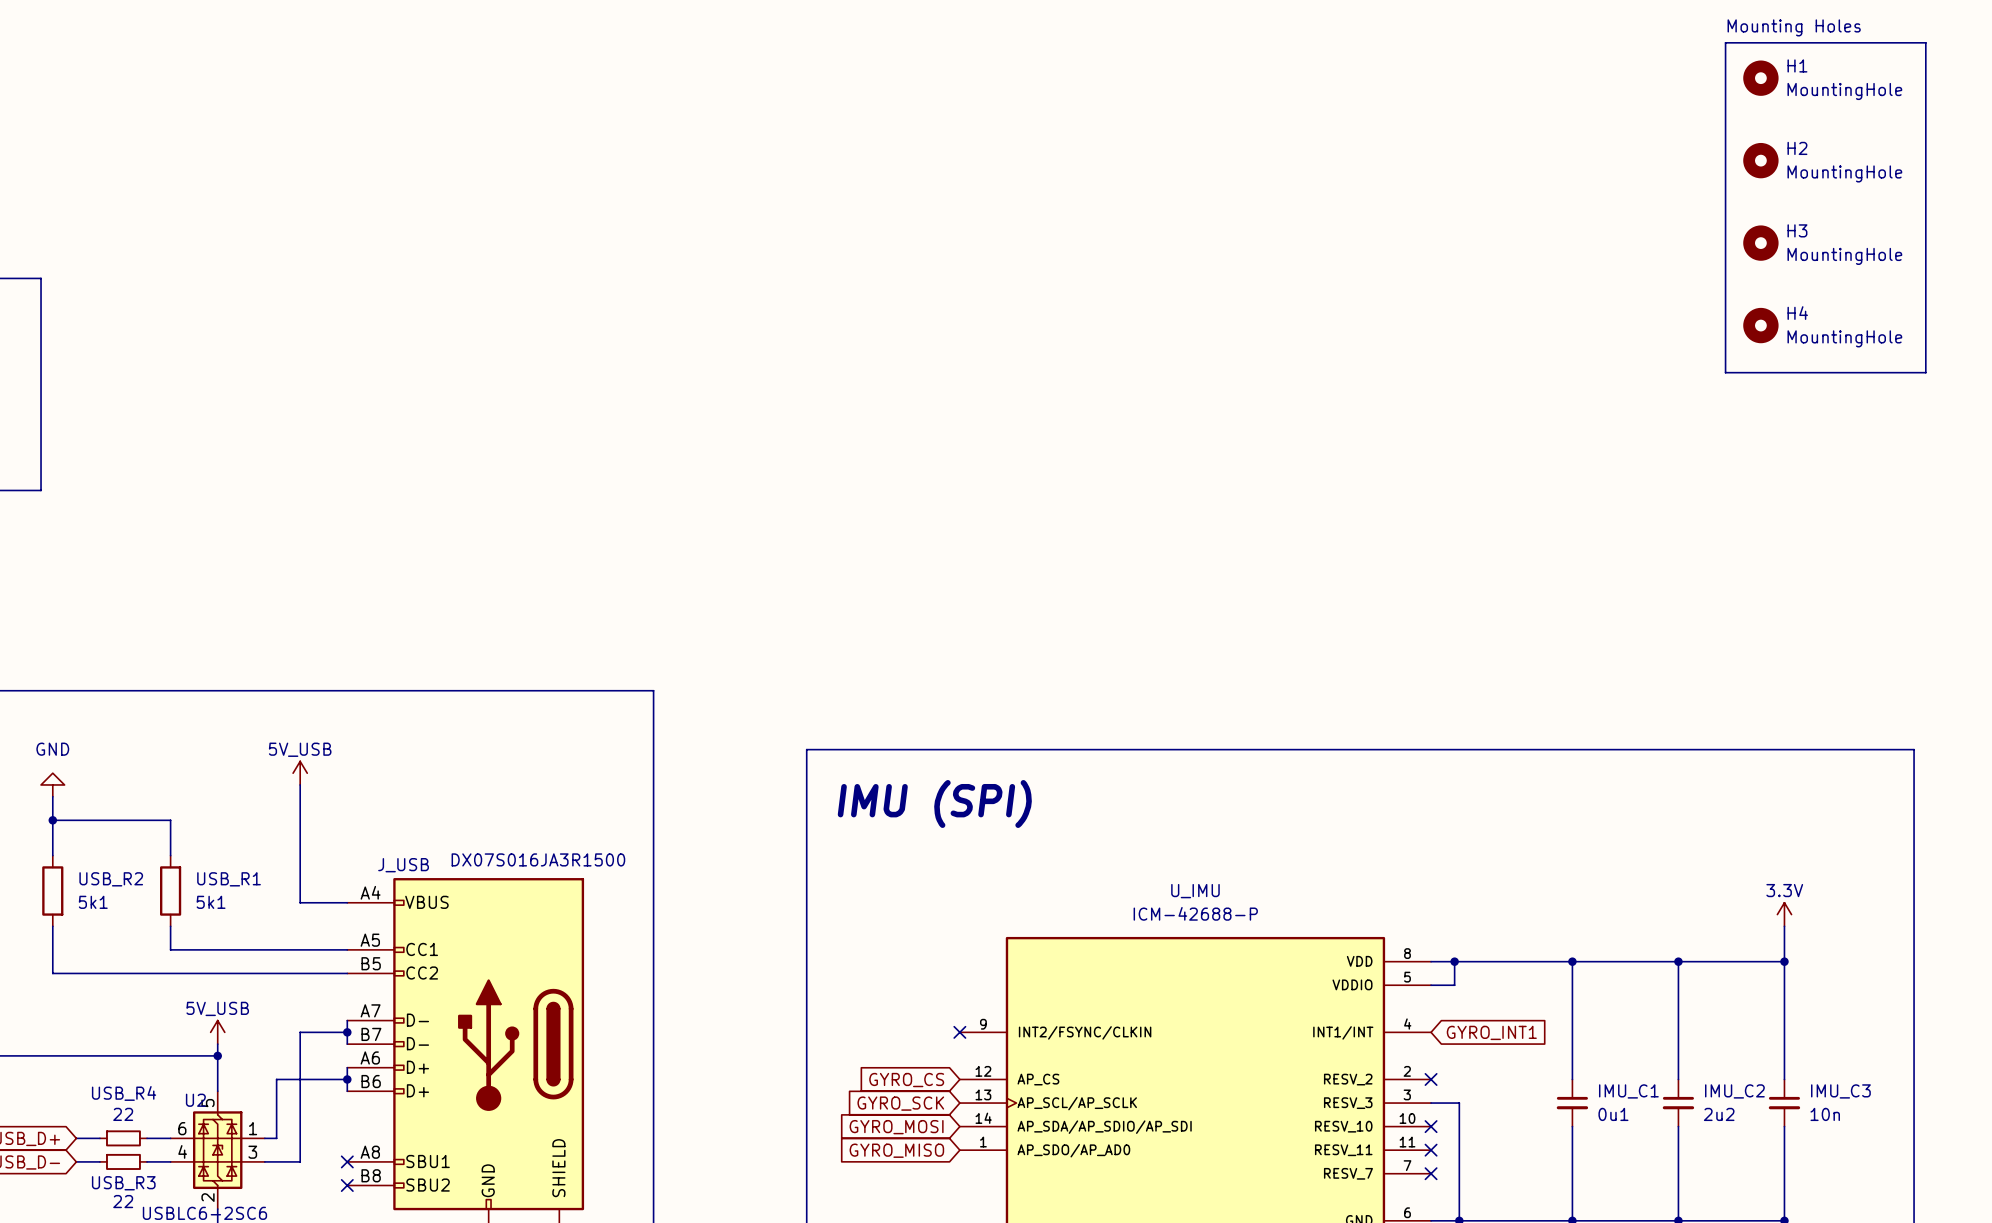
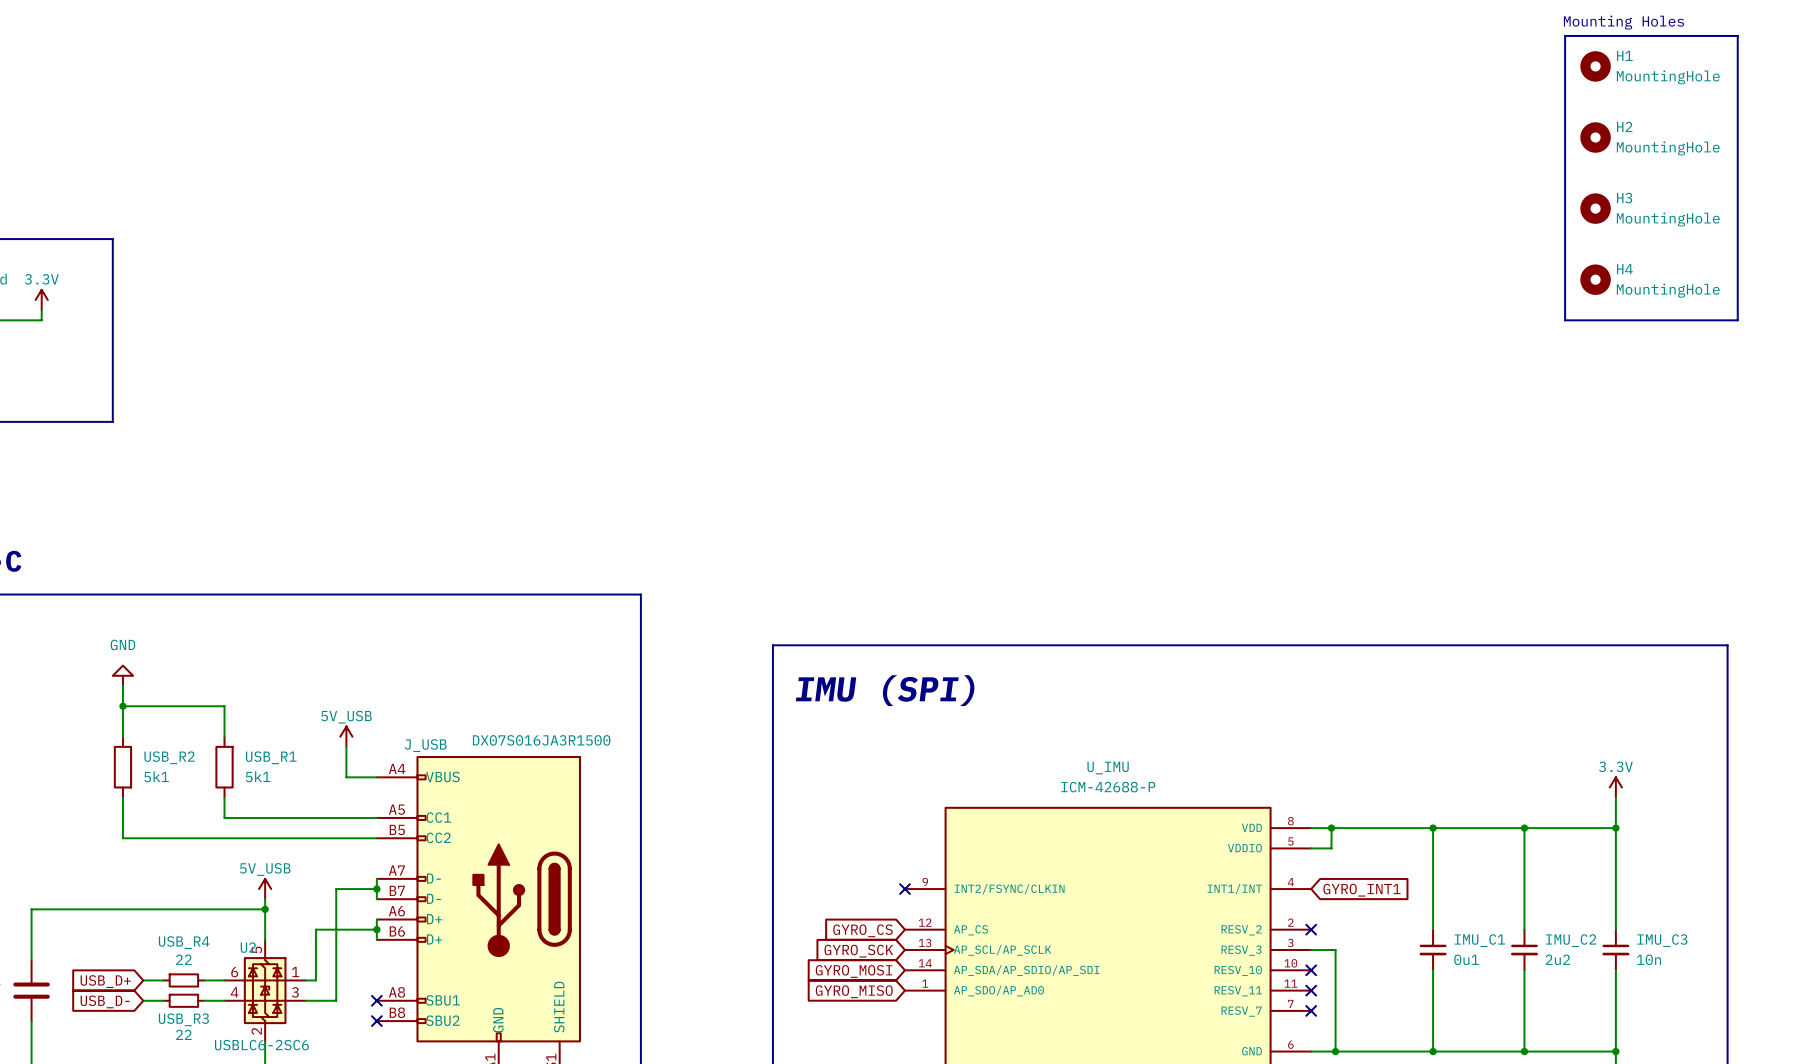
power symbol position: 5V_USB (300, 773) -> 5V_USB (346, 736)
wire: (300, 784) (300, 902) (311, 902) -> (346, 746) (346, 777)

